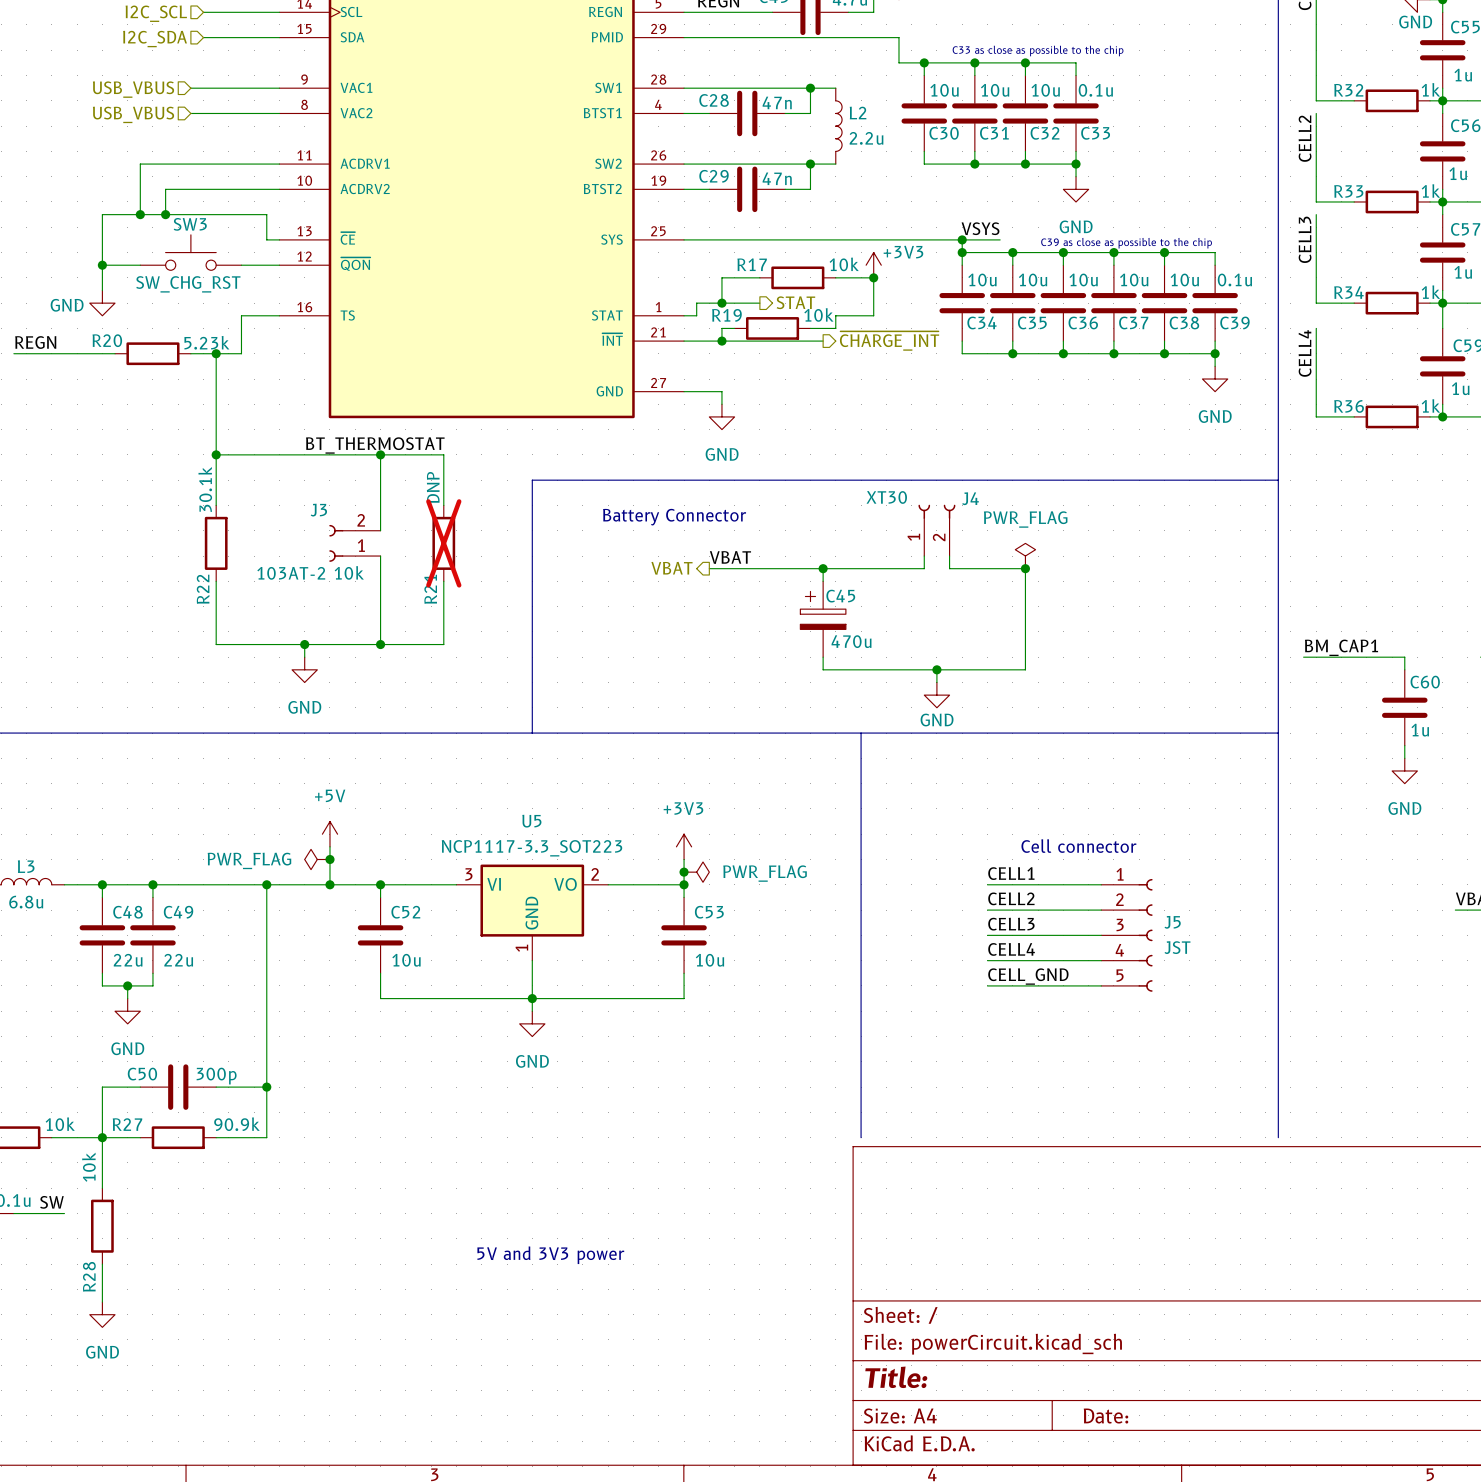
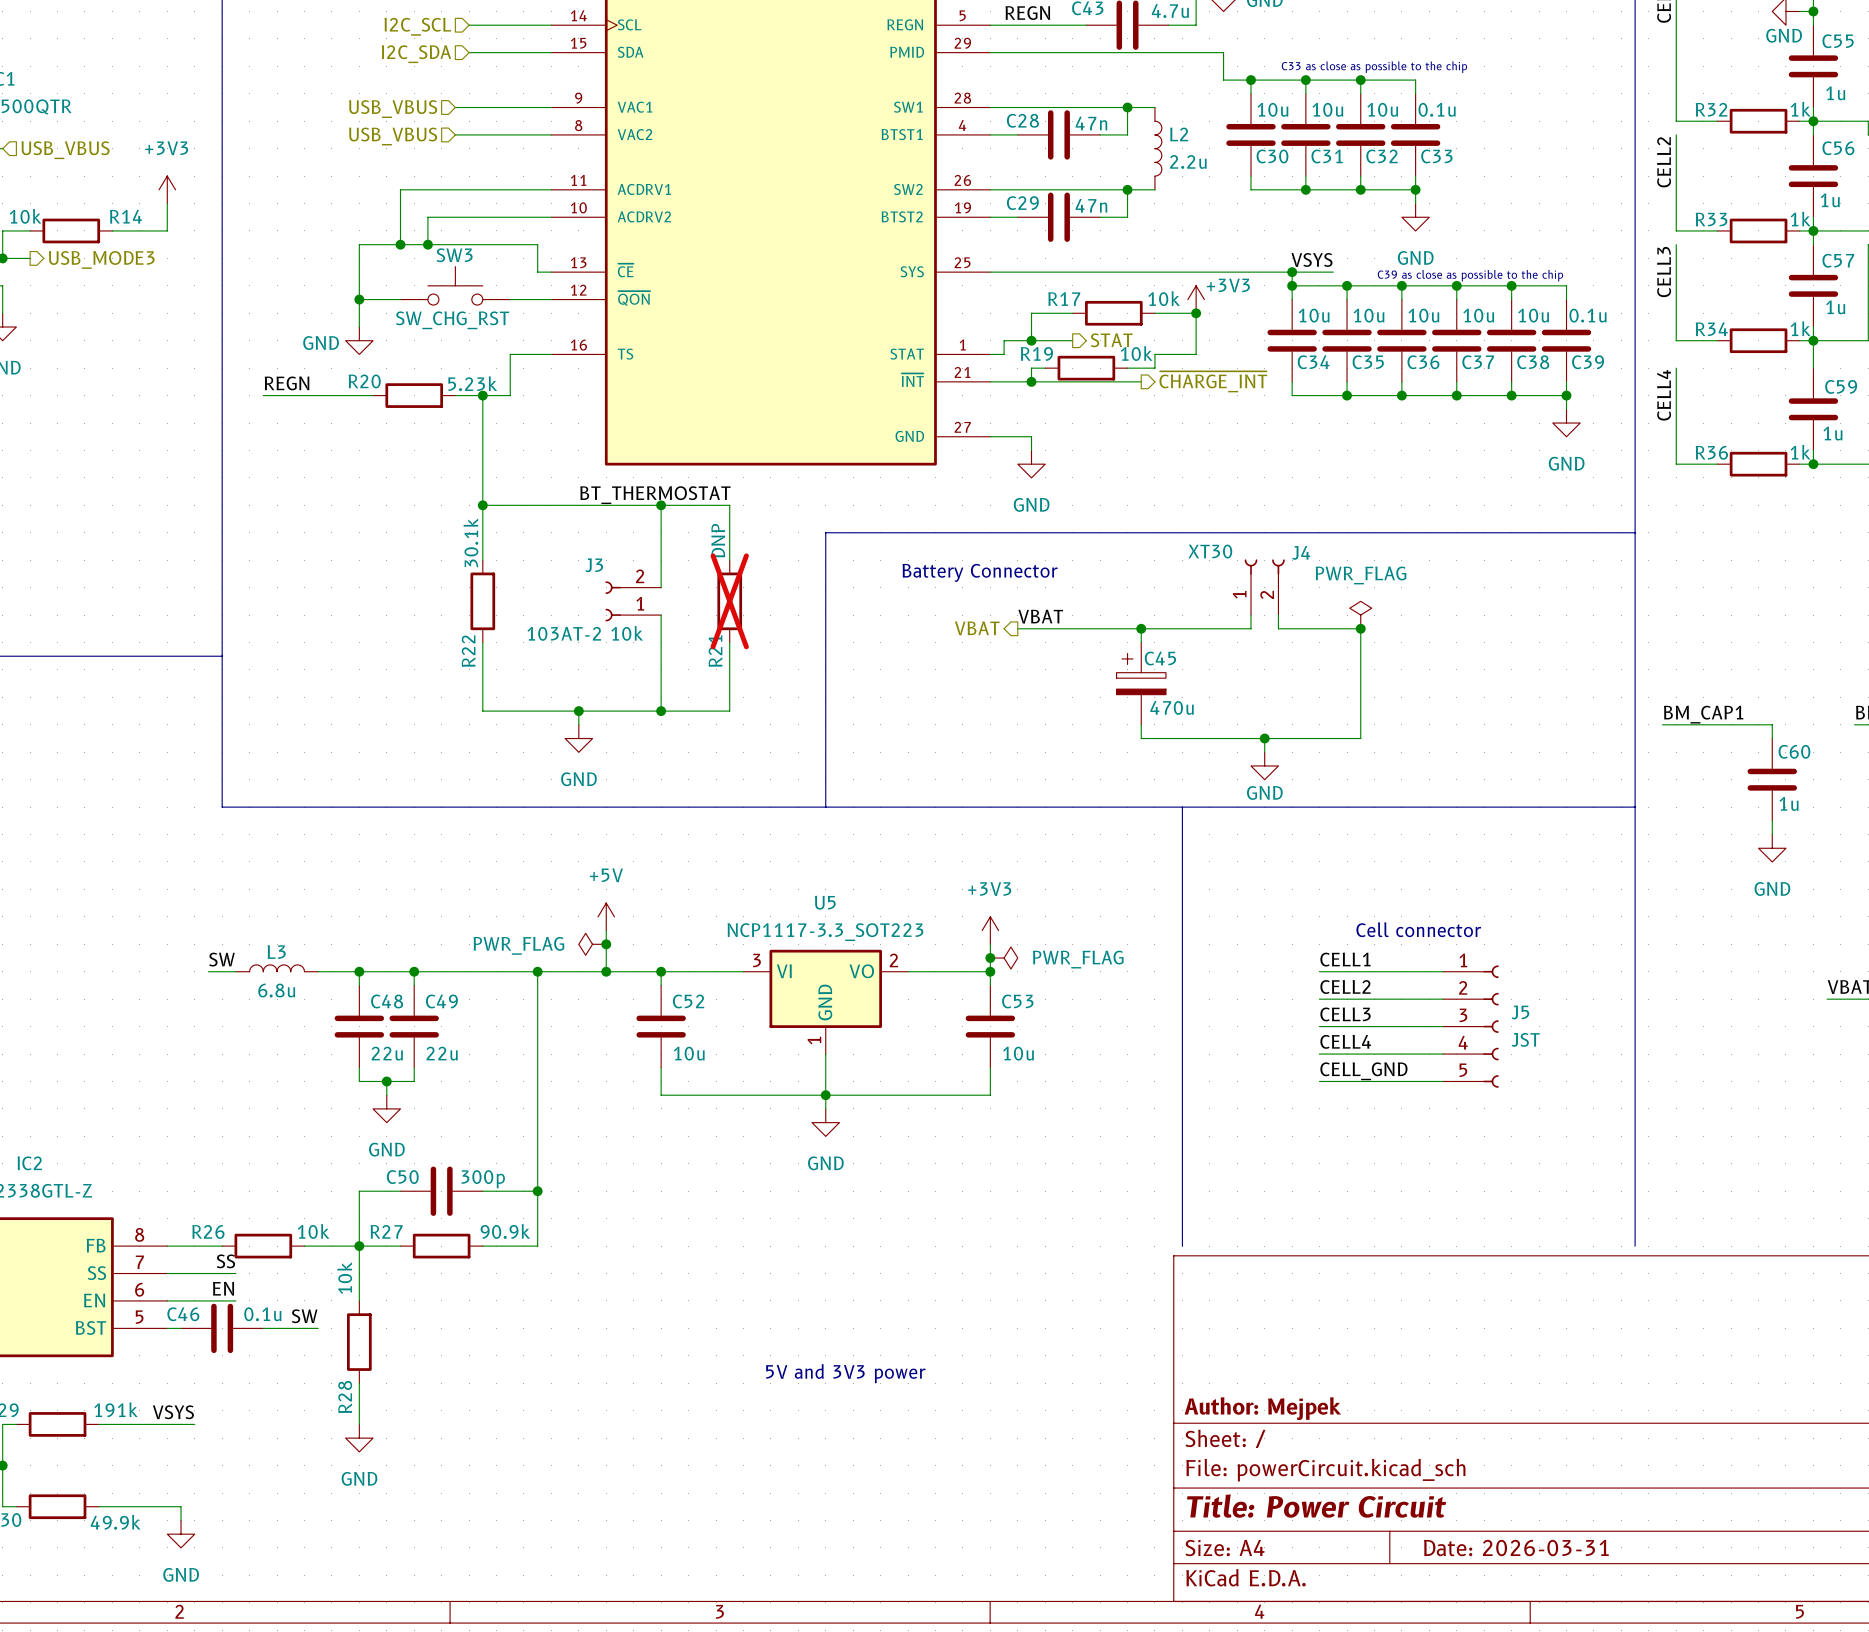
title block: none -> Author: Mejpek (1262, 1408)
title block: Title: (896, 1377) -> Title: Power Circuit (1316, 1506)
title block: Date: (1106, 1416) -> Date: 2026-03-31 (1516, 1548)

